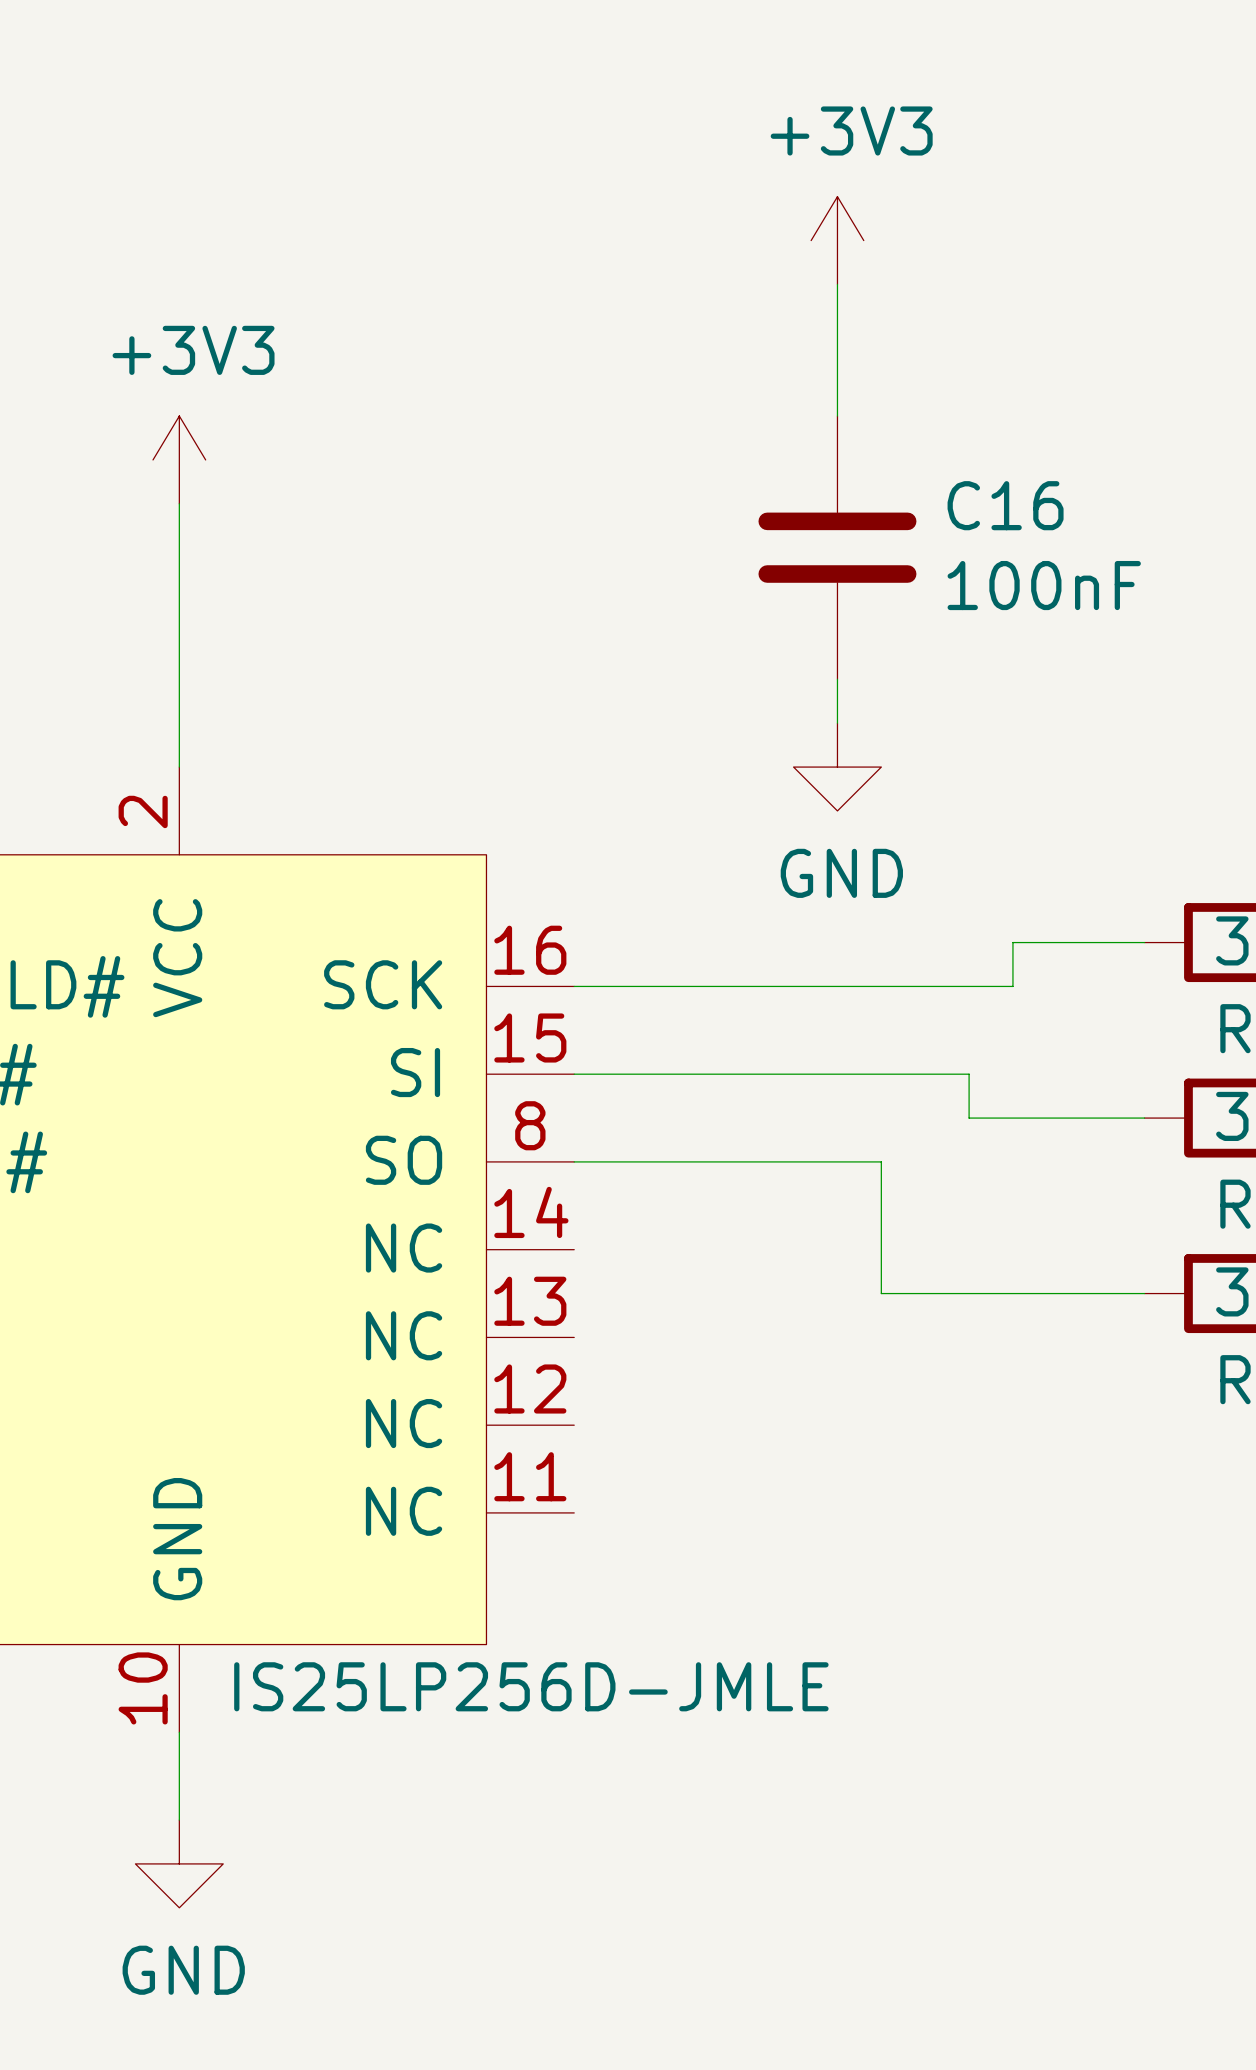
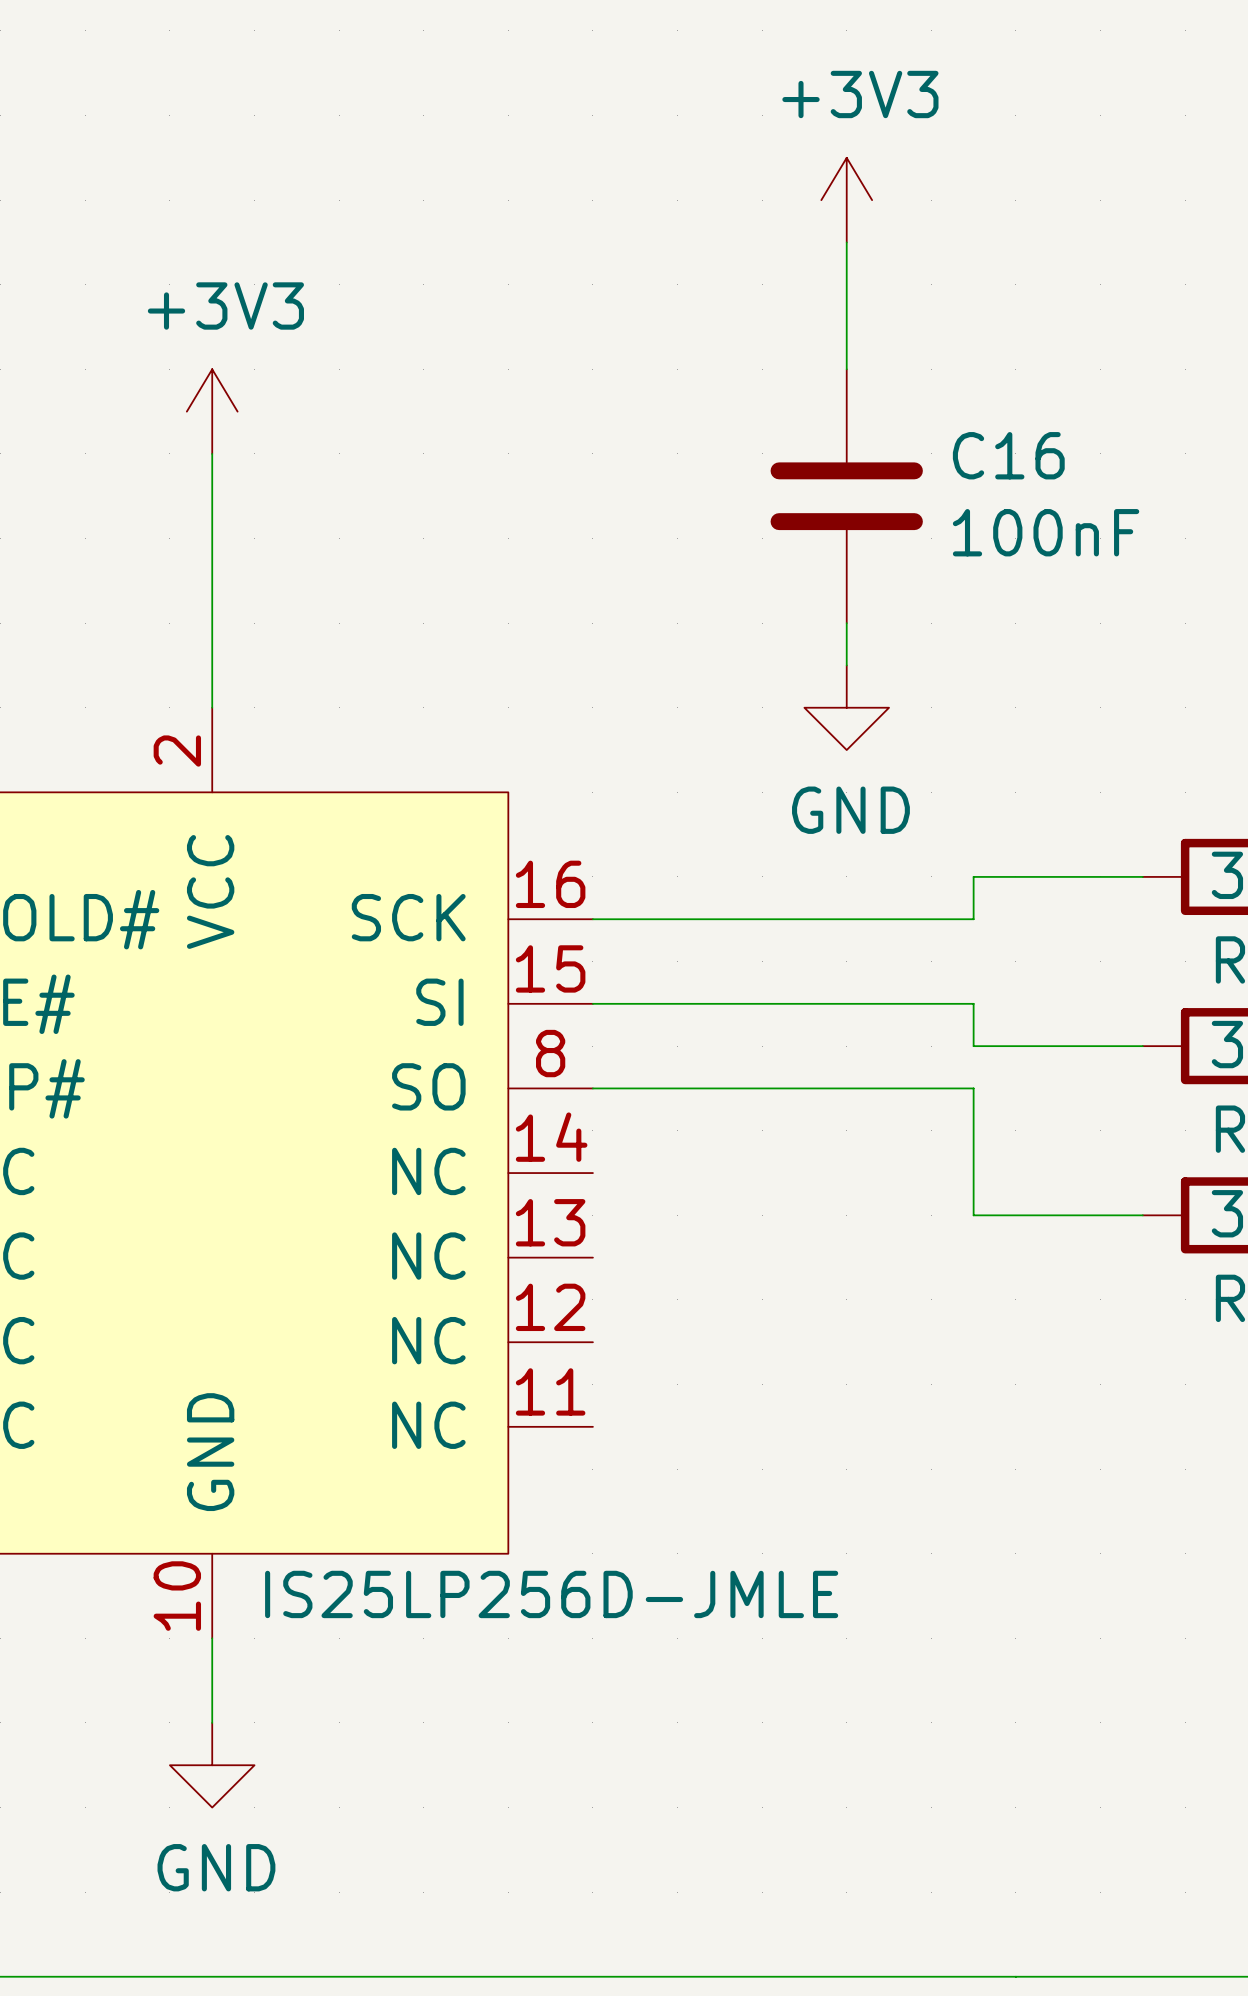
wire: (1012, 942) (1012, 986) (969, 986) -> (1015, 876) (973, 876) (973, 919)
wire: (881, 1161) (881, 1293) (969, 1293) -> (889, 1088) (973, 1088) (973, 1215)

